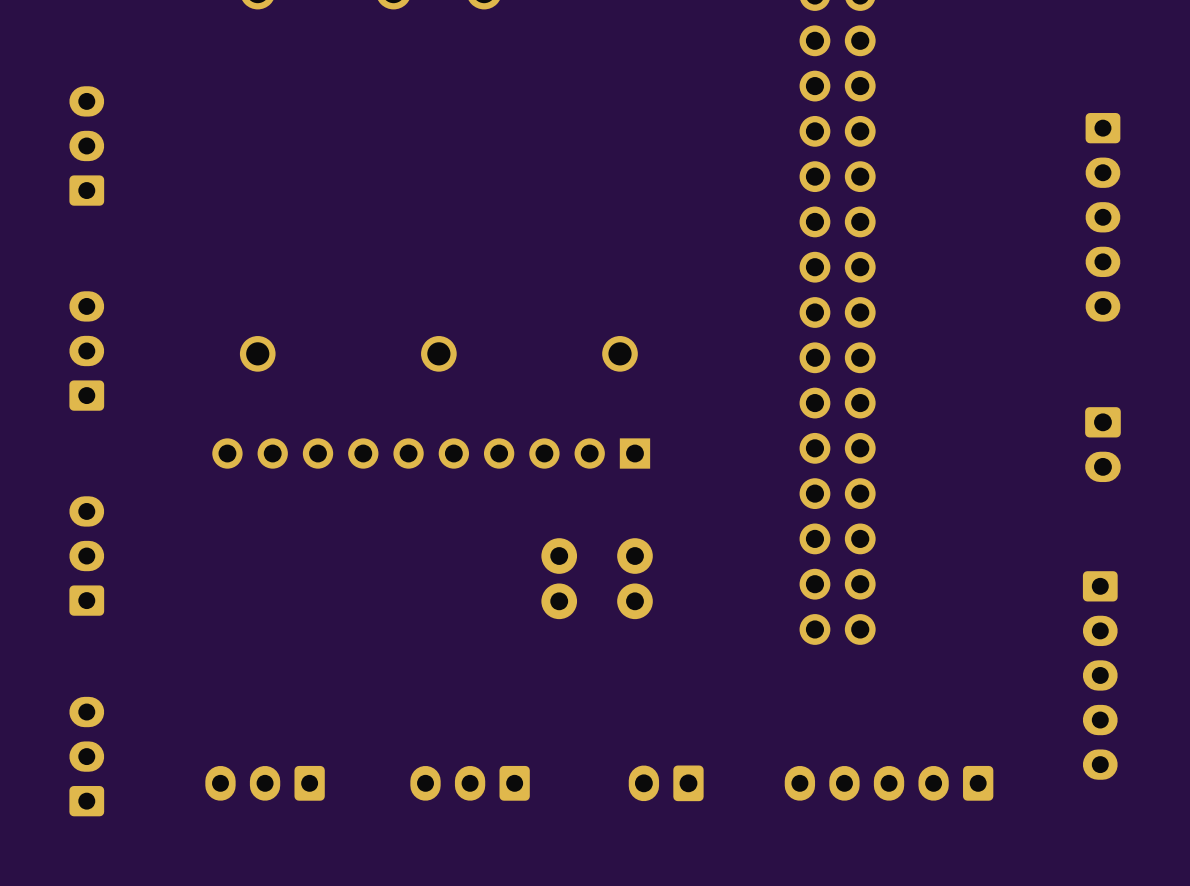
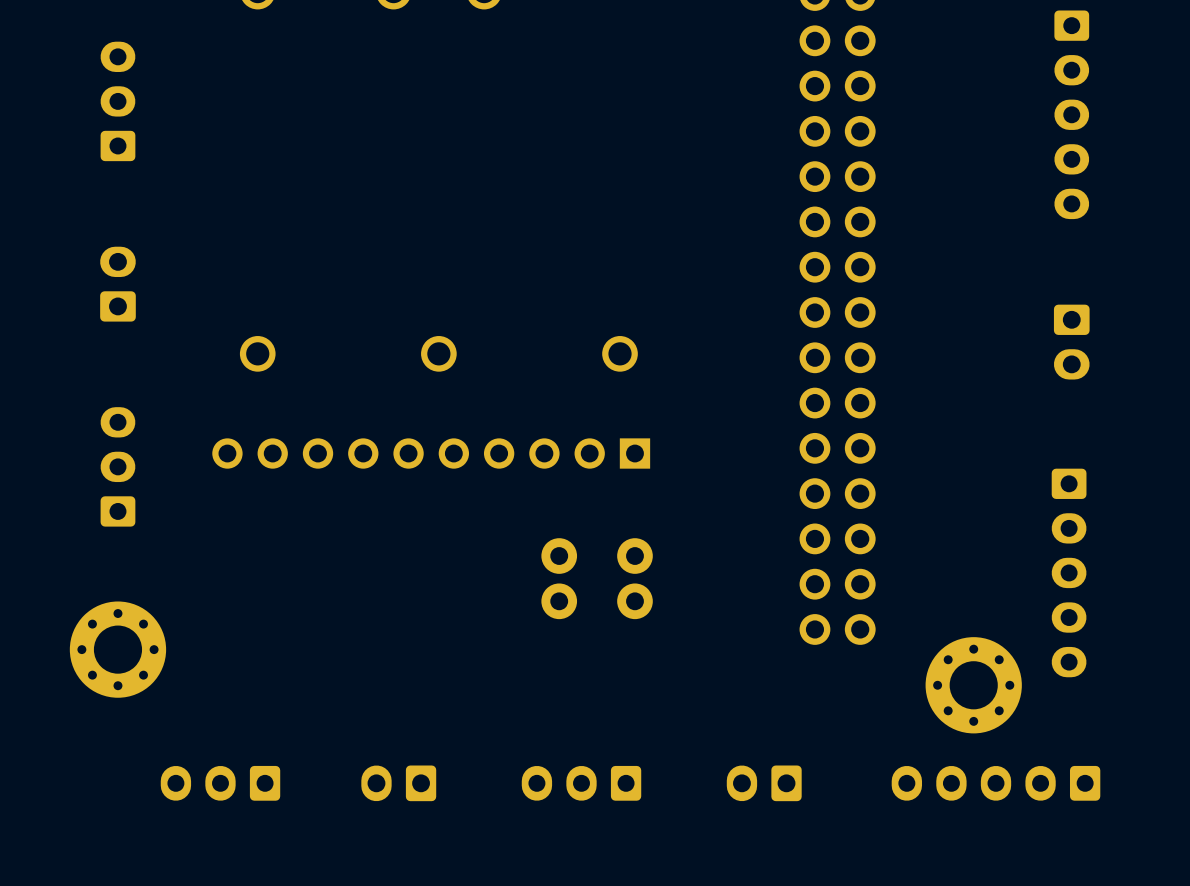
part position: (86, 145) -> (117, 101)
part position: (1102, 217) -> (1071, 114)
part: none -> (117, 284)
part: (86, 351) -> none
part position: (1102, 444) -> (1071, 342)
part: none -> (117, 466)
part: (86, 556) -> none
part: none -> (1069, 572)
part: none -> (117, 649)
part: (1100, 675) -> none
part: none -> (973, 685)
part: (86, 756) -> none
part position: (265, 783) -> (220, 783)
part: none -> (398, 783)
part position: (470, 783) -> (581, 783)
part position: (666, 783) -> (764, 783)
part: (889, 783) -> none
part: none -> (996, 783)

